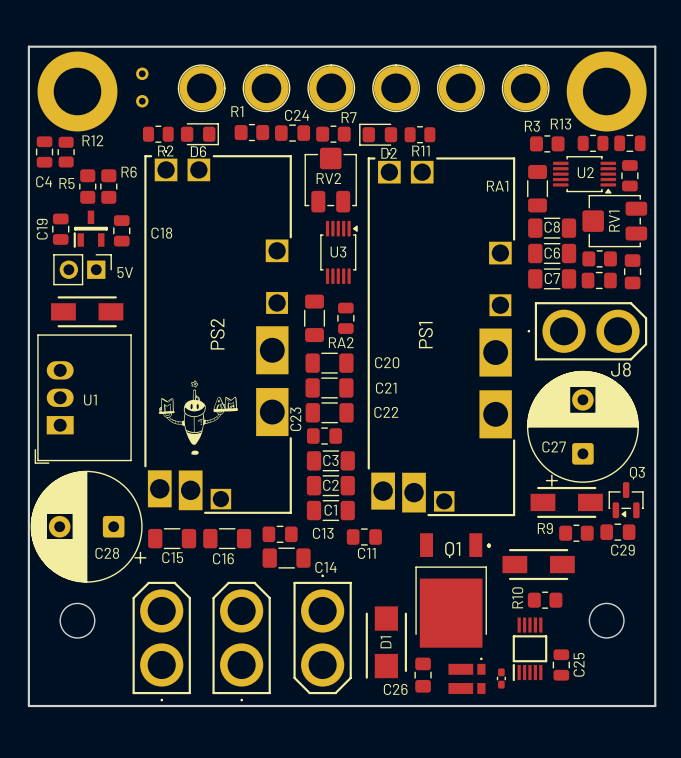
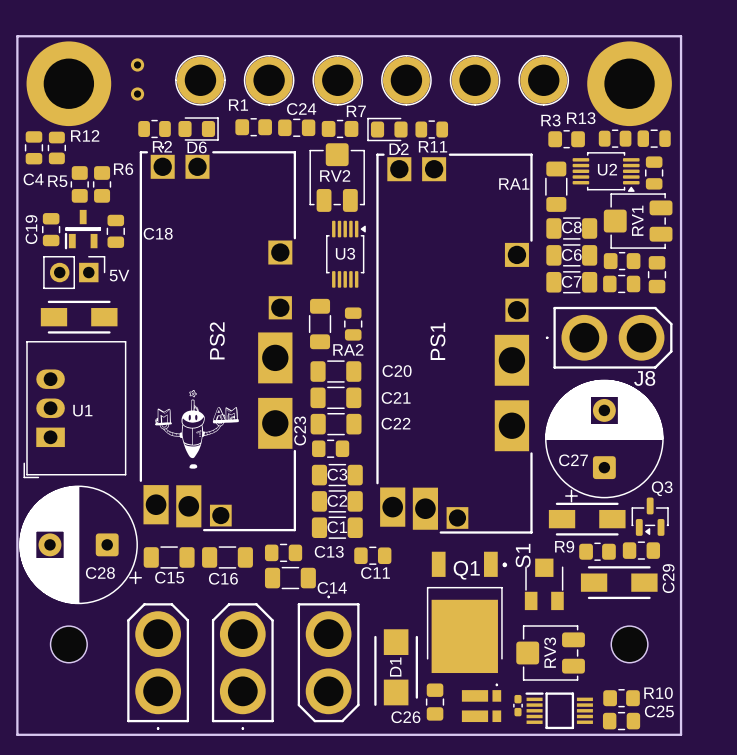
C29 name rotation: 0° (622, 550) -> 90° counterclockwise (668, 578)
S1: none -> (544, 584)
part position: (538, 564) -> (619, 582)
R10 name rotation: 0° (517, 597) -> 90° clockwise (658, 693)
R10 name position: R10 (517, 597) -> R10 (658, 693)
R10 position: (545, 600) -> (621, 698)
RV3: none -> (550, 653)
part rotation: 0° (529, 649) -> 90° clockwise (559, 710)
C25 footprint: [552, 649, 570, 681] -> [602, 711, 641, 731]

